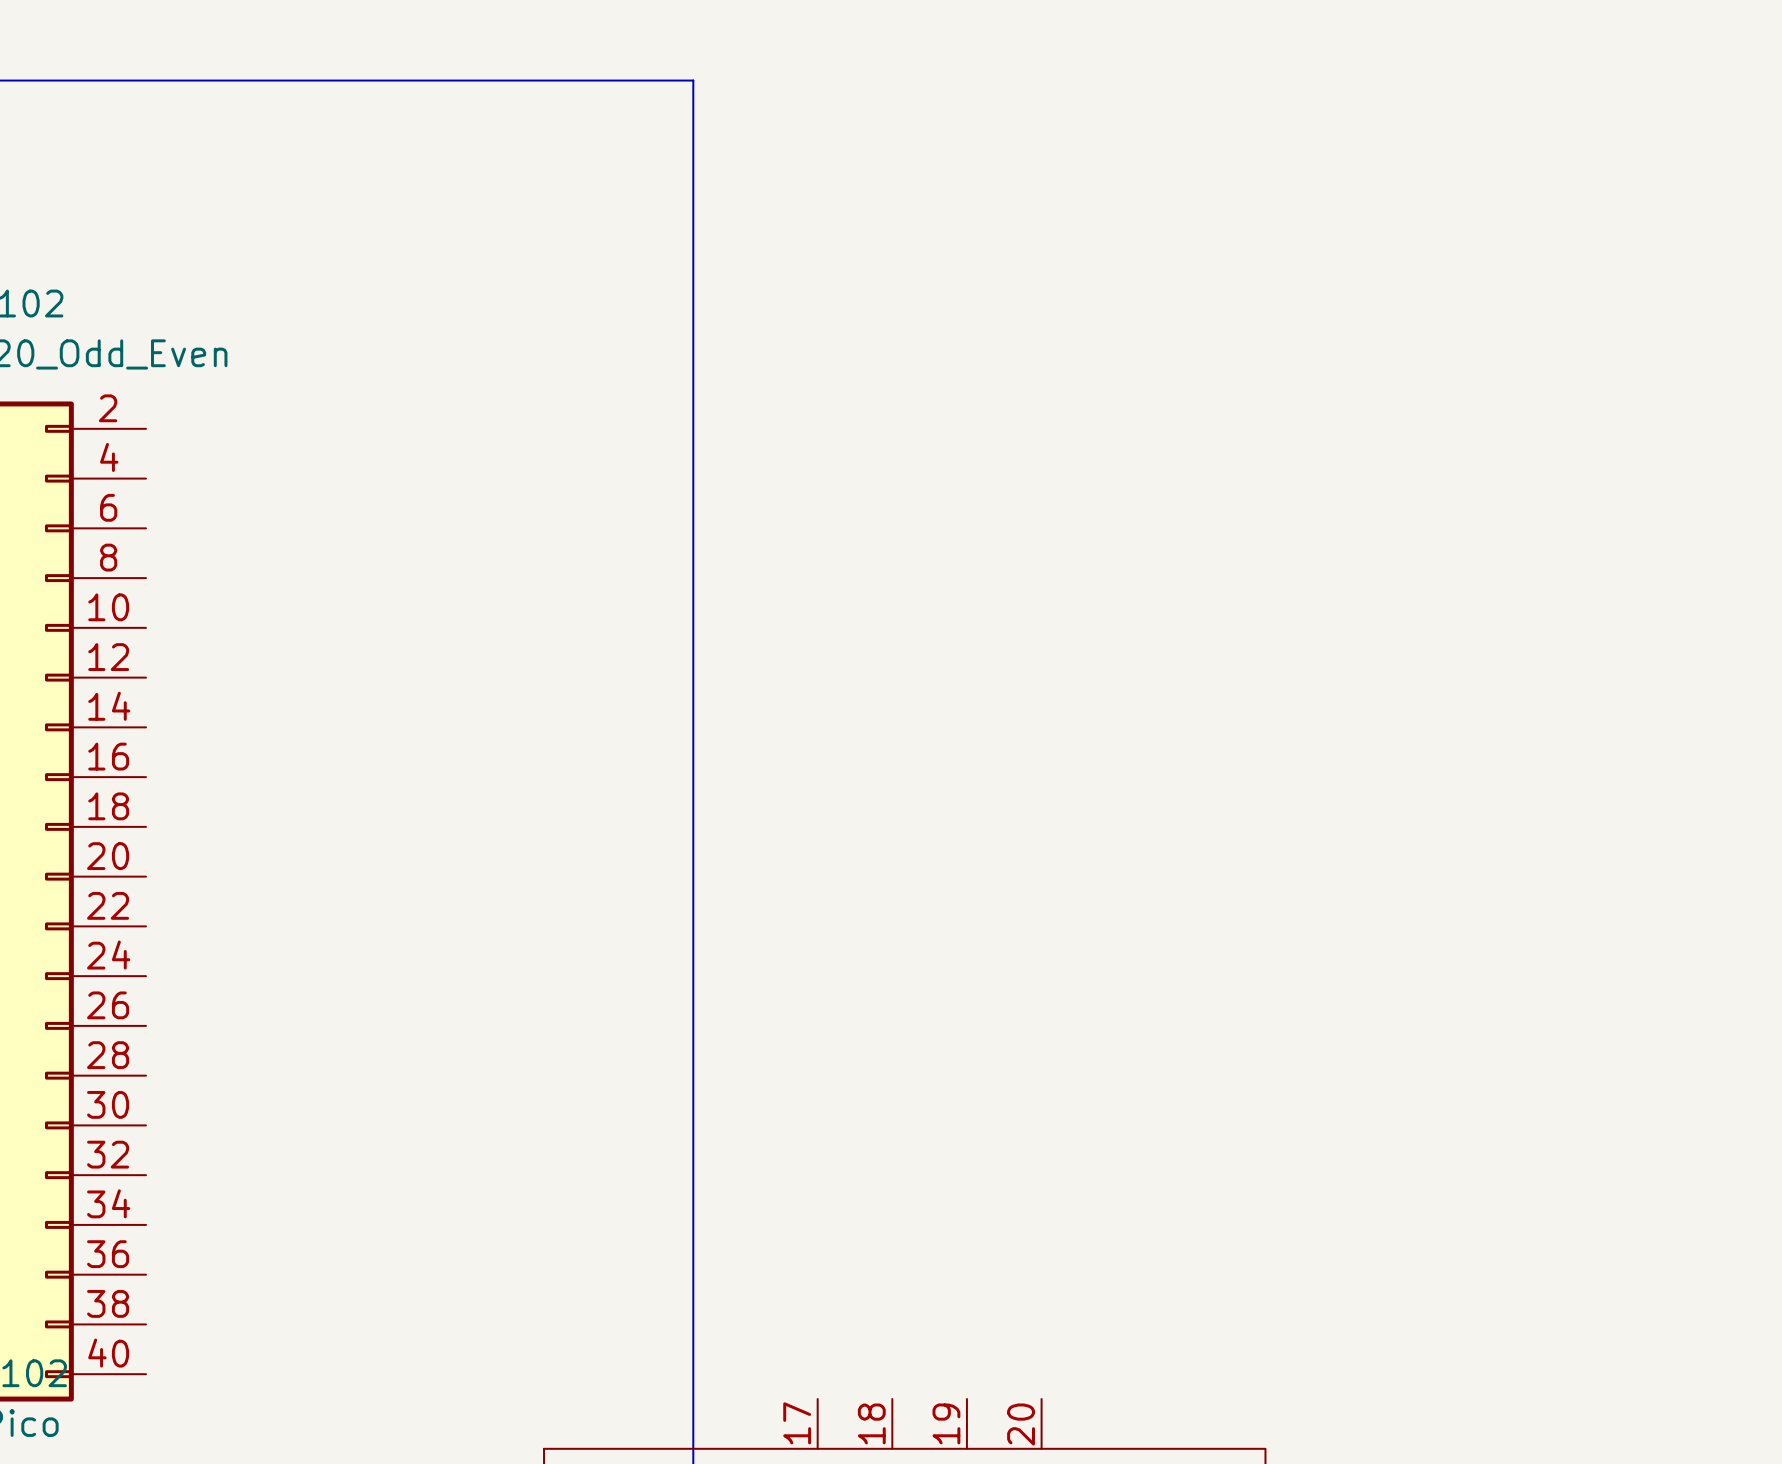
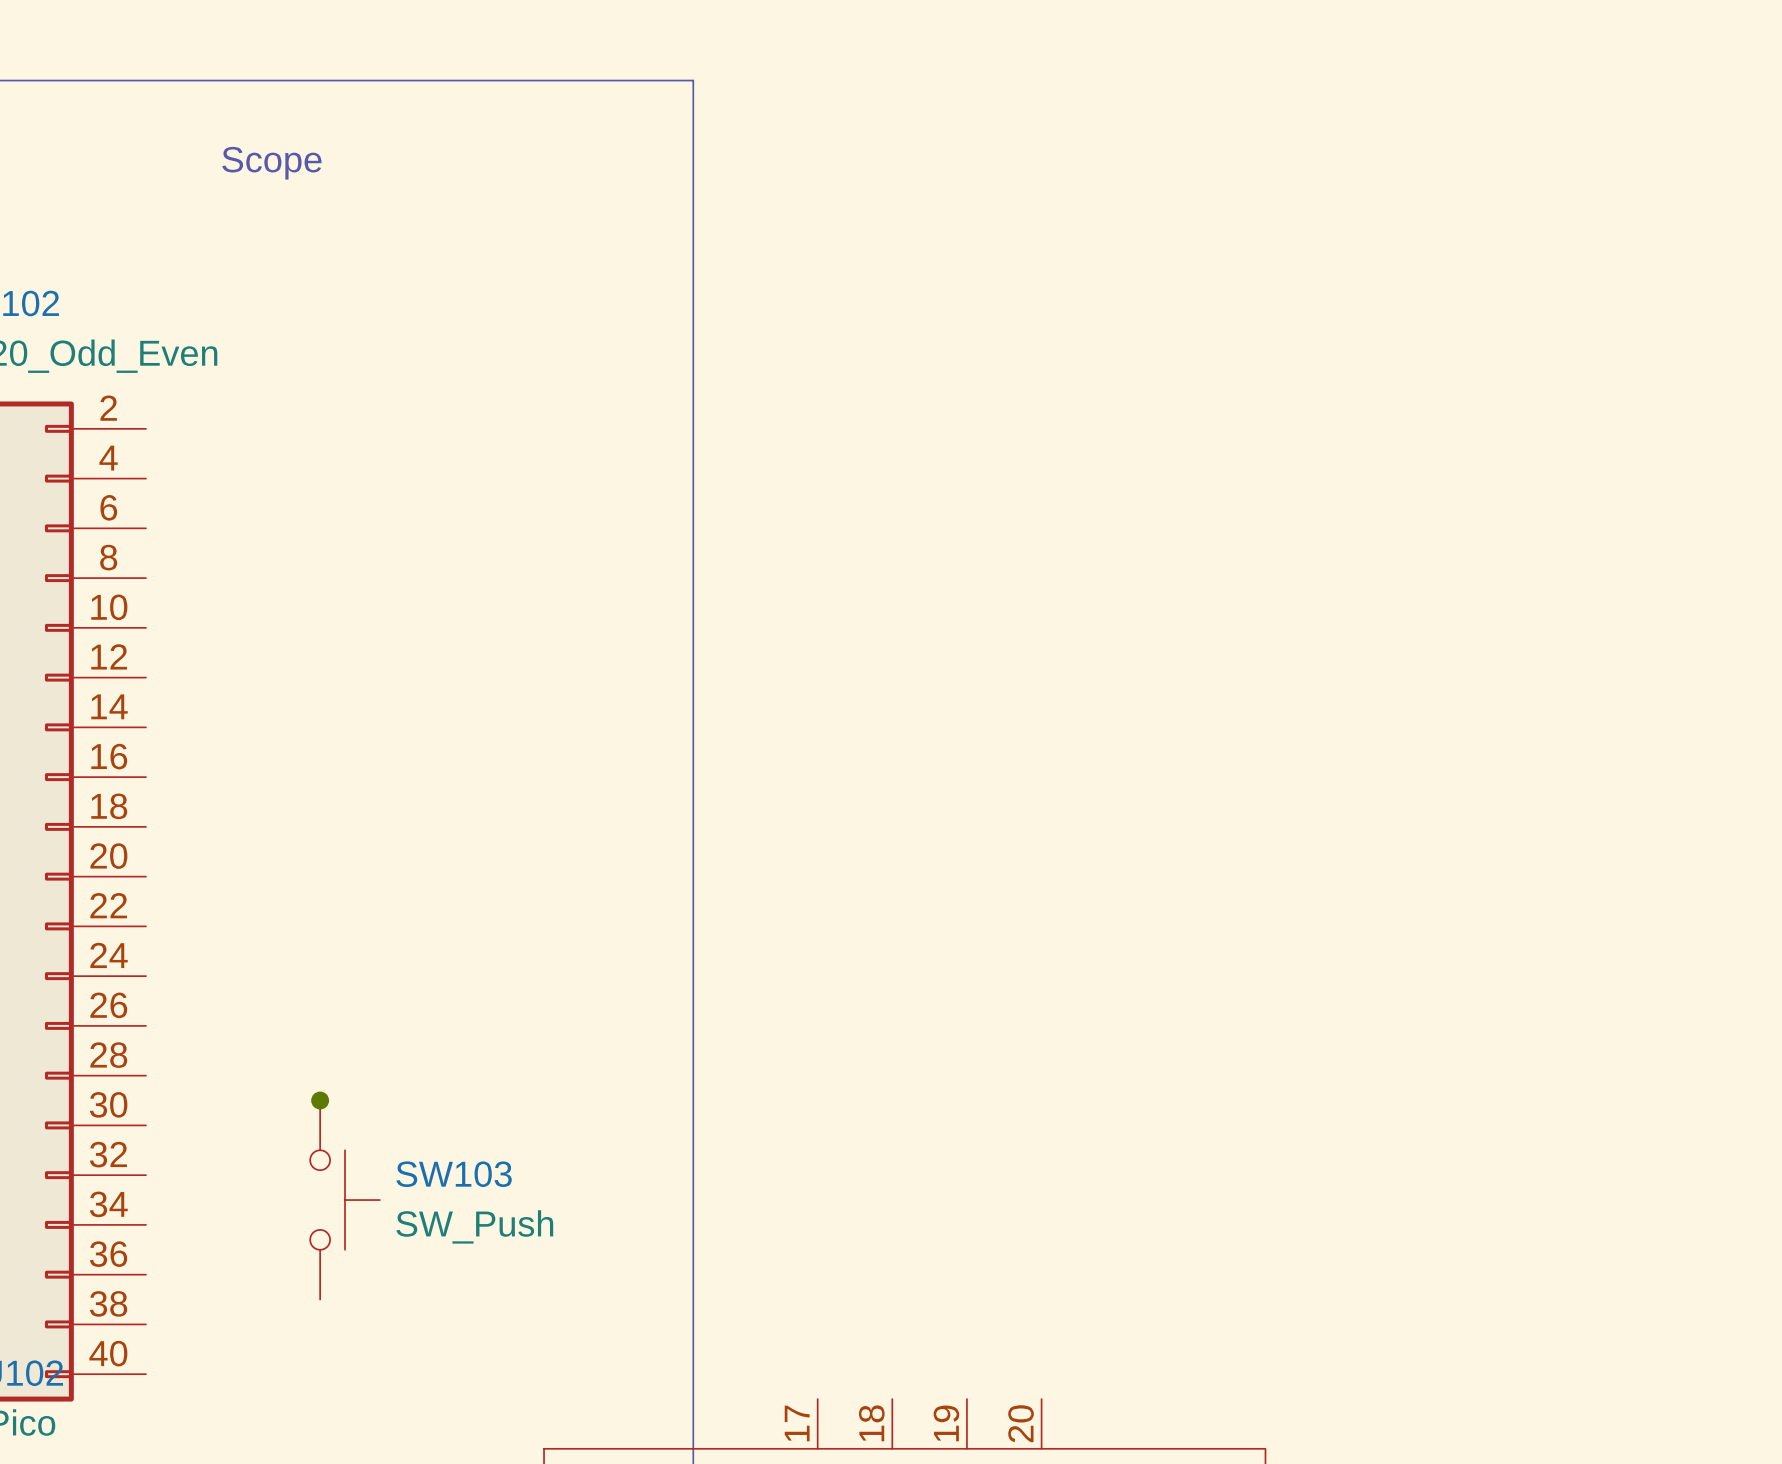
text: none -> Scope (271, 163)
junction: none -> (320, 1100)
SW103: none -> SW_Push (345, 1200)

